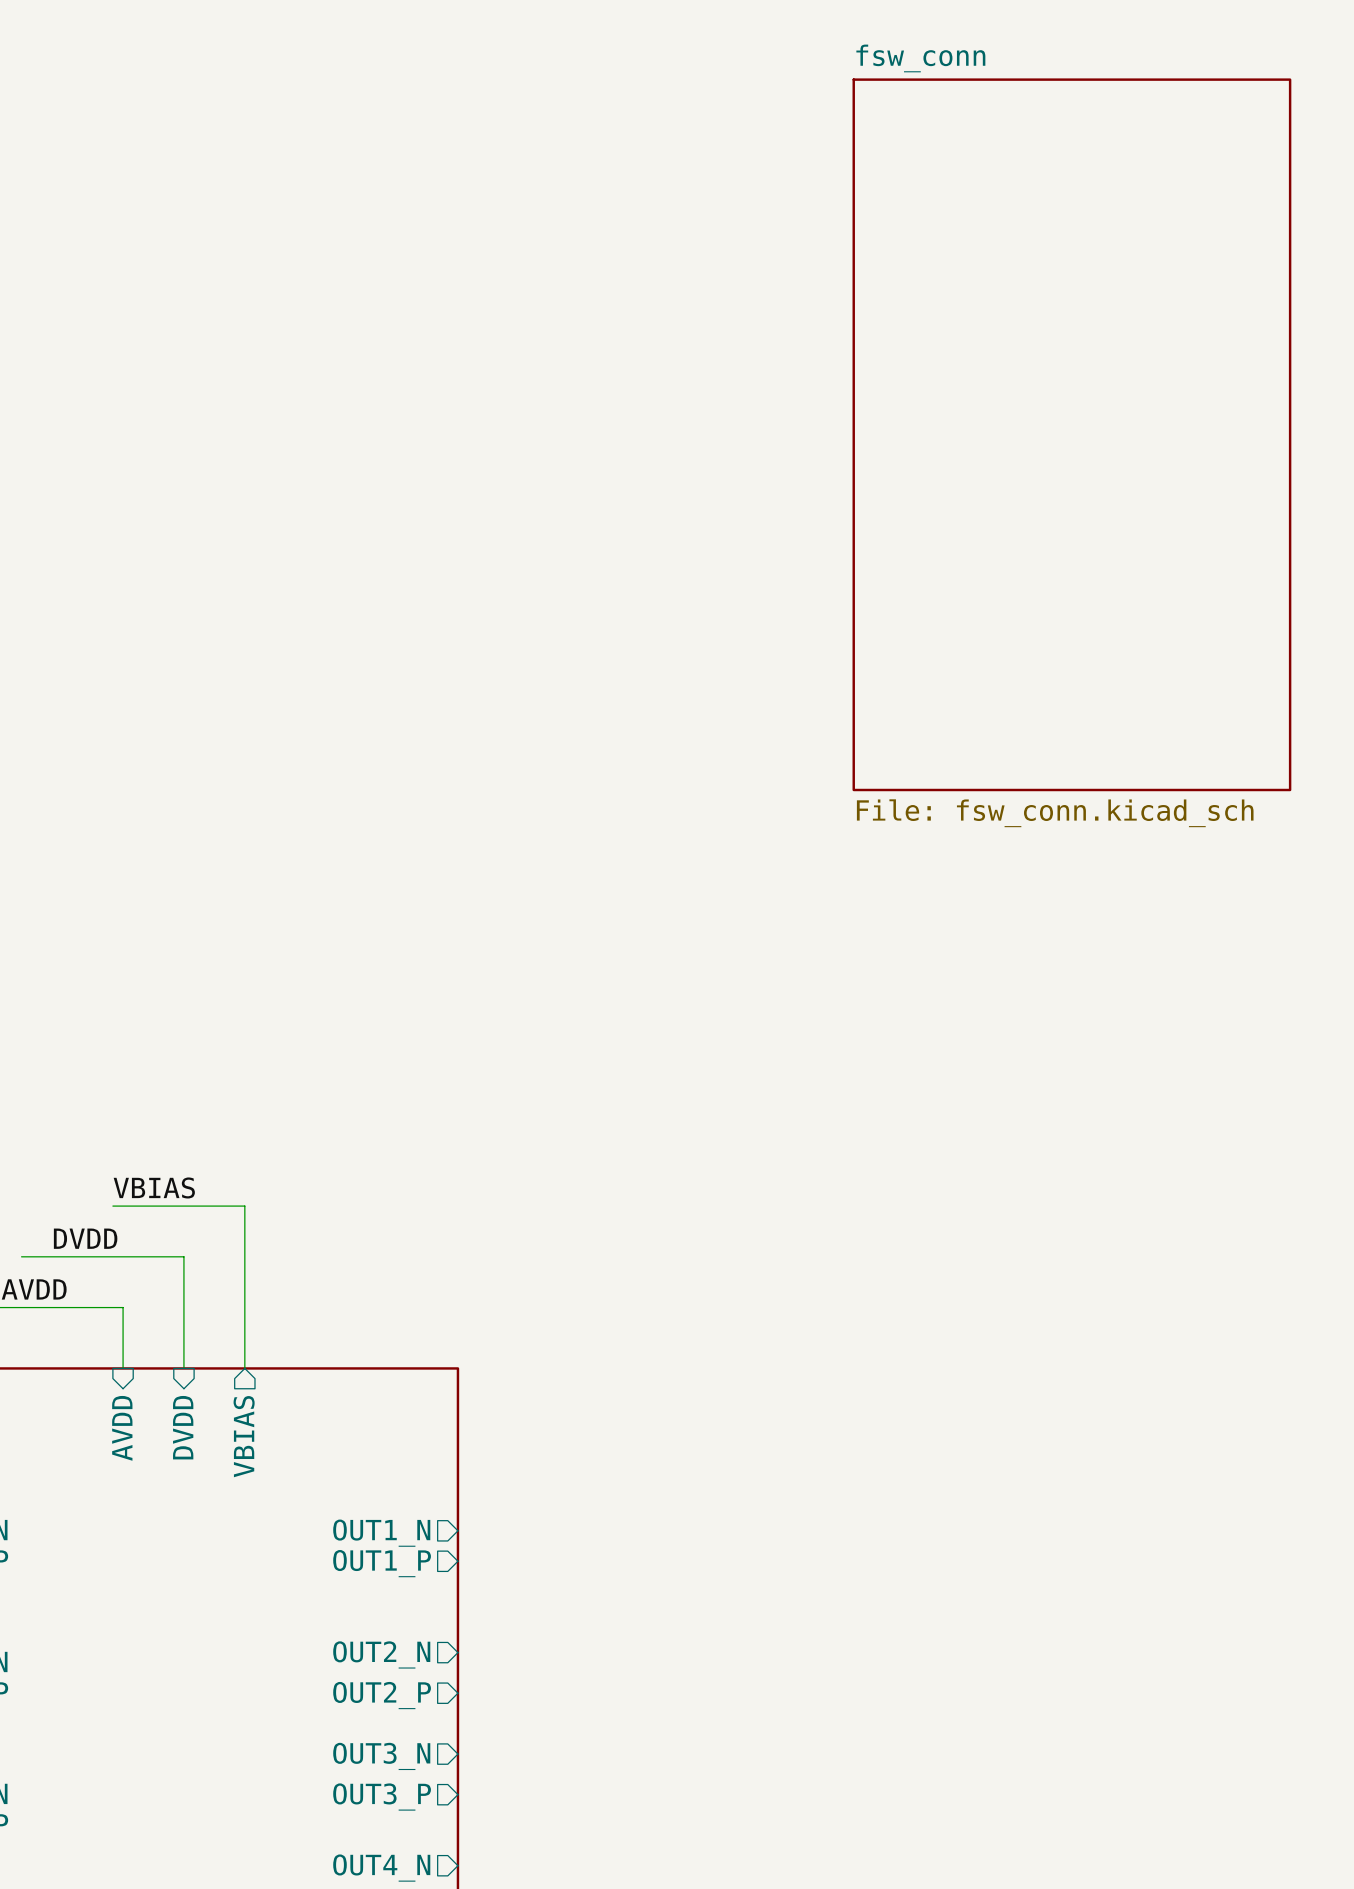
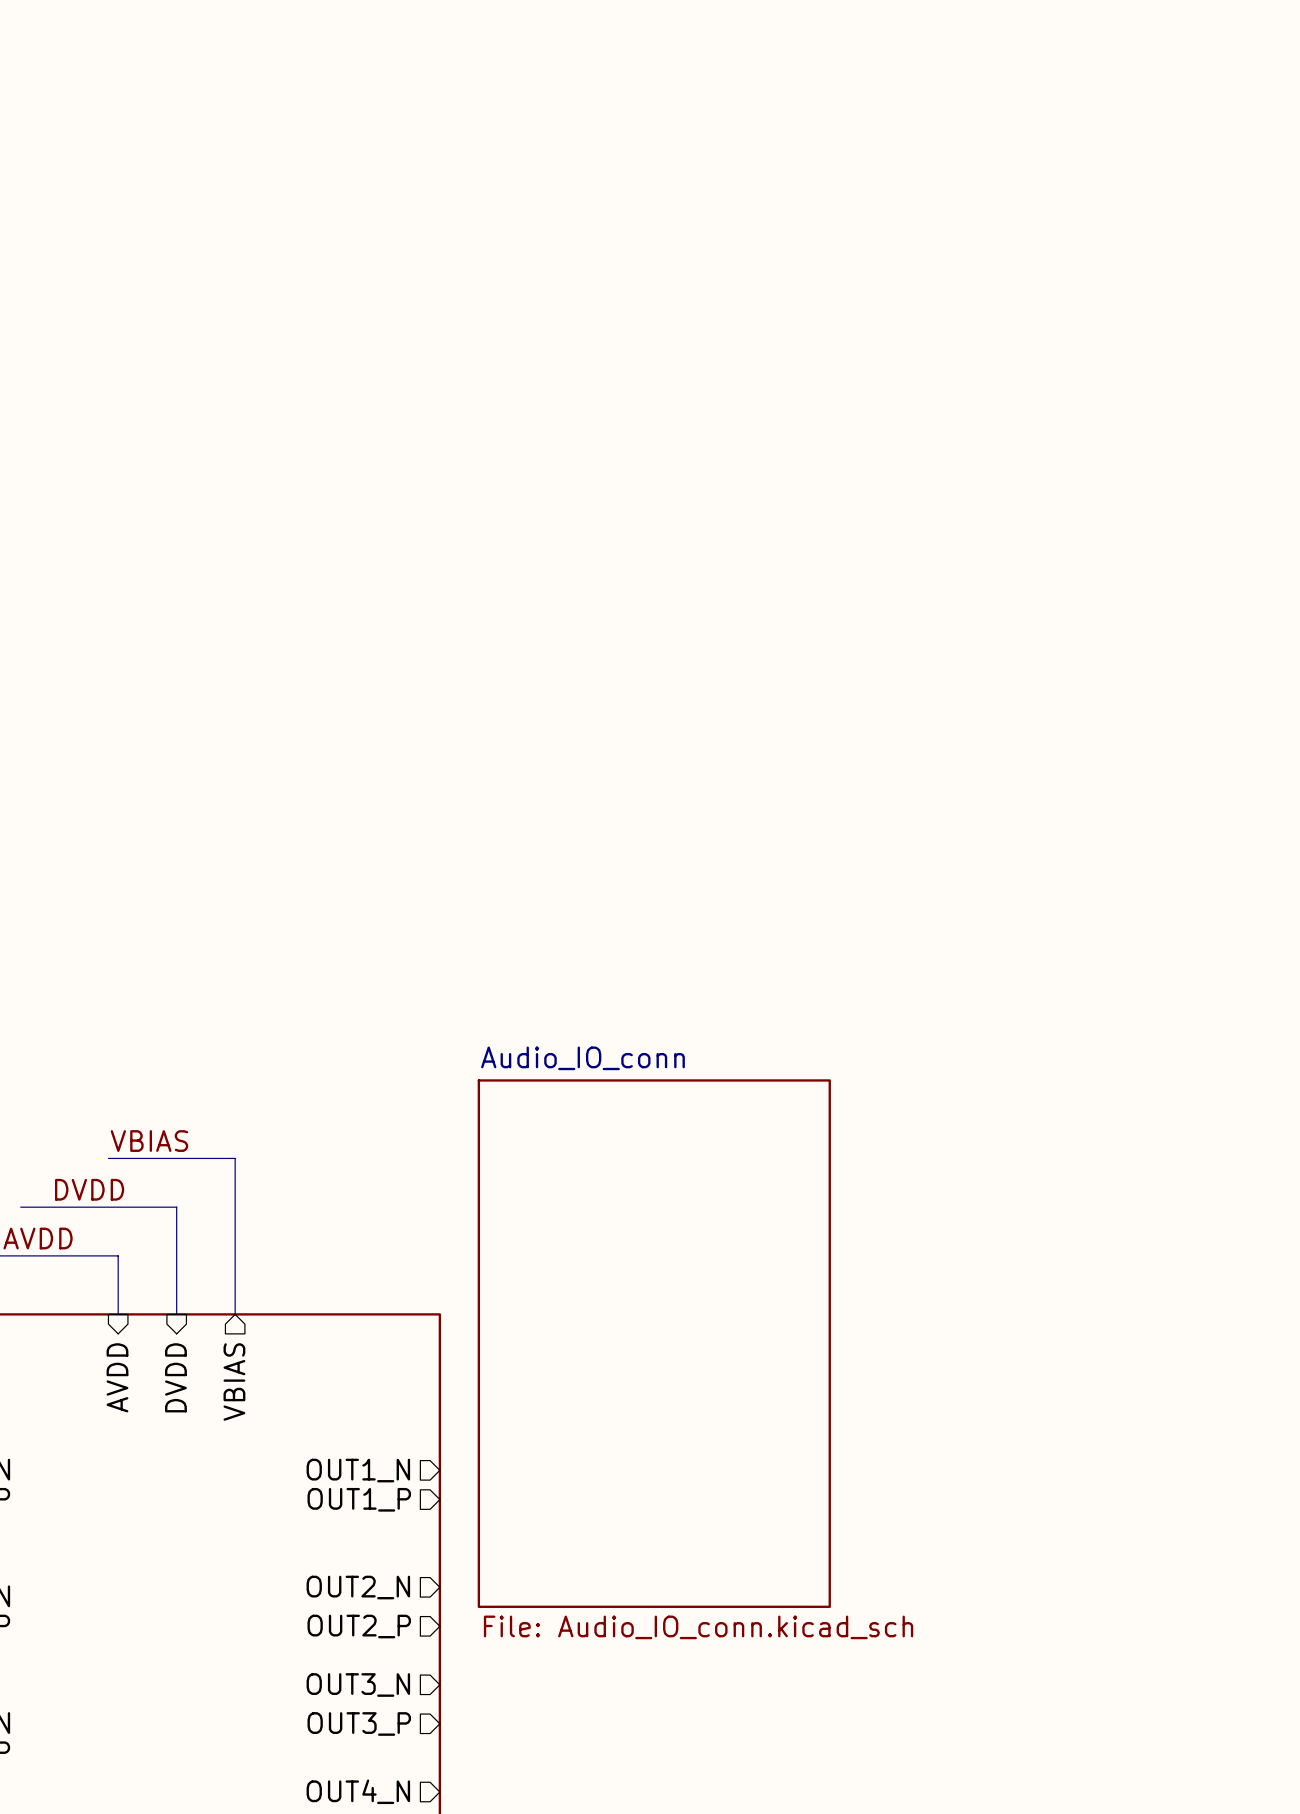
sheet fsw_conn: File: fsw_conn.kicad_sch (1071, 434) -> none
sheet Audio_IO_conn: none -> File: Audio_IO_conn.kicad_sch (654, 1343)

